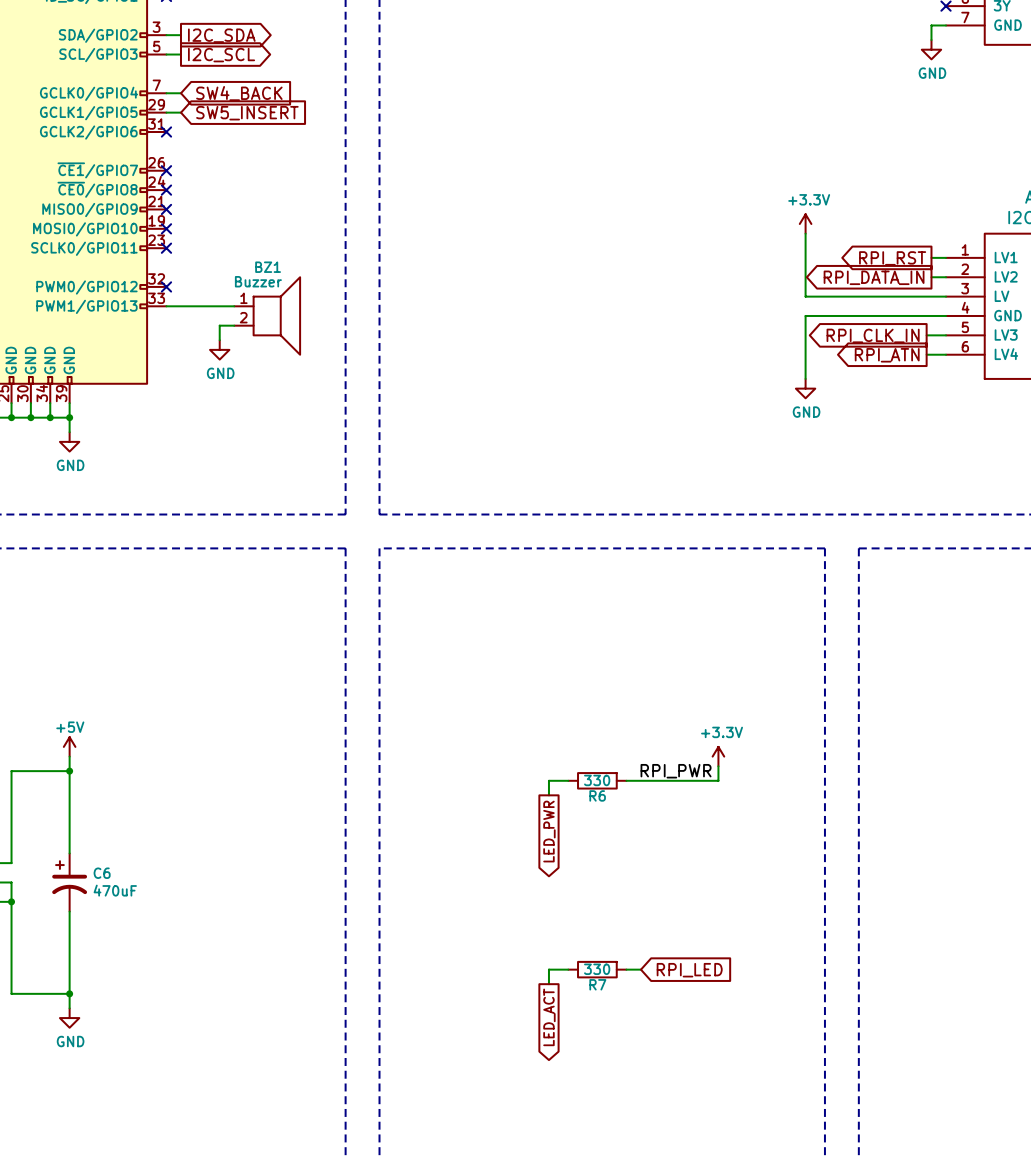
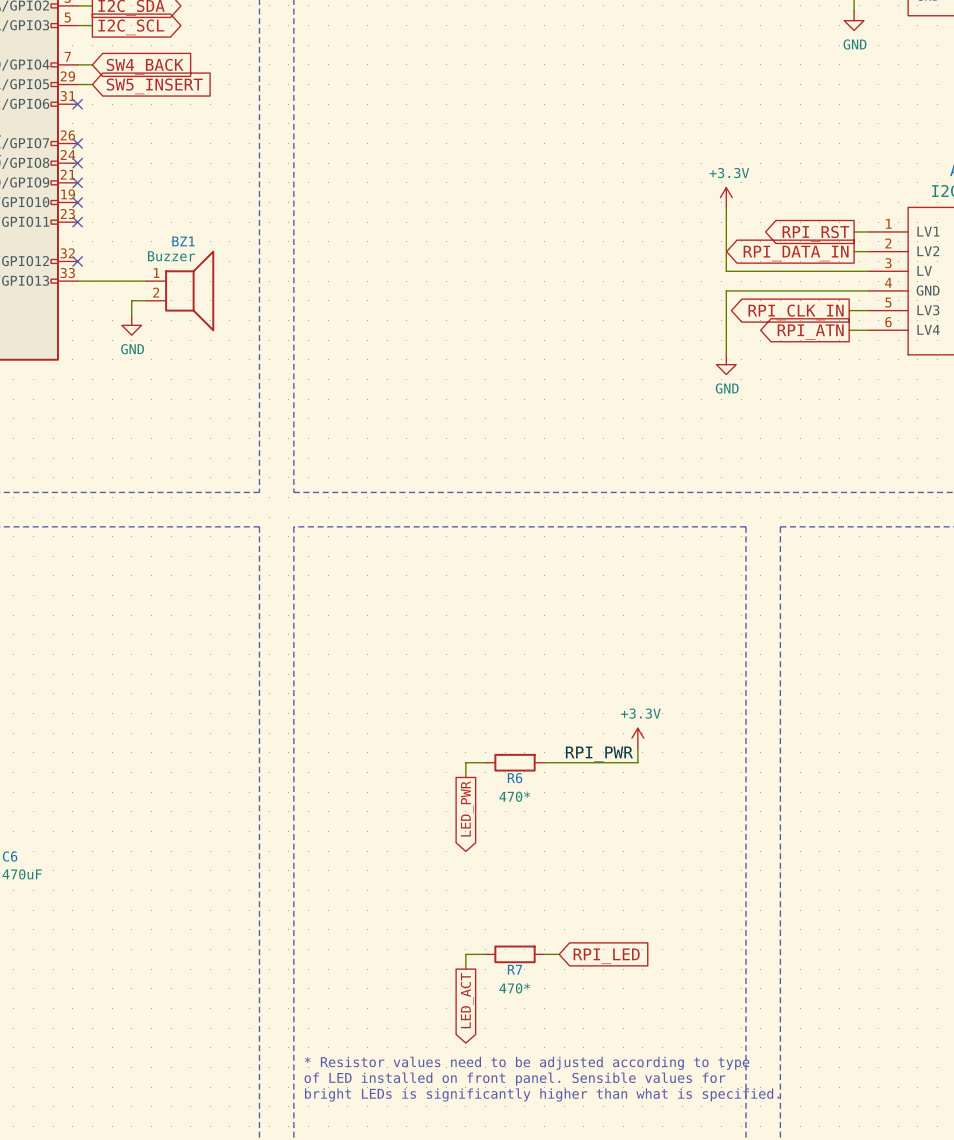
R6 value: 330 (597, 780) -> 470* (514, 796)
R7 value: 330 (597, 969) -> 470* (514, 988)
text: none -> * Resistor values need to be adjusted according to type (527, 1063)
text: none -> of LED installed on front panel. Sensible values for (514, 1079)
text: none -> bright LEDs is significantly higher than what is specified. (542, 1094)

